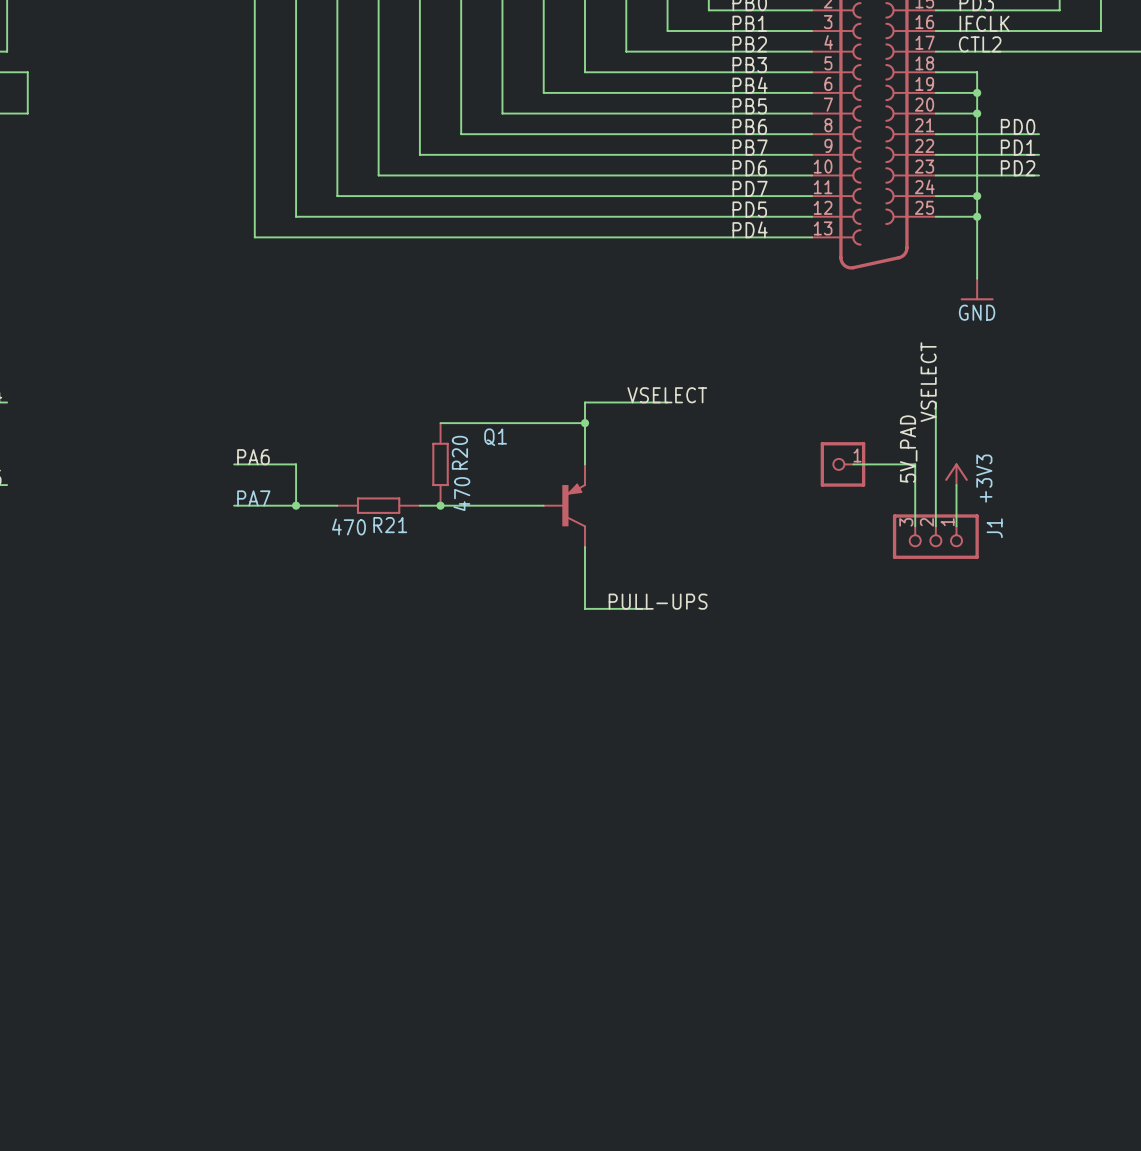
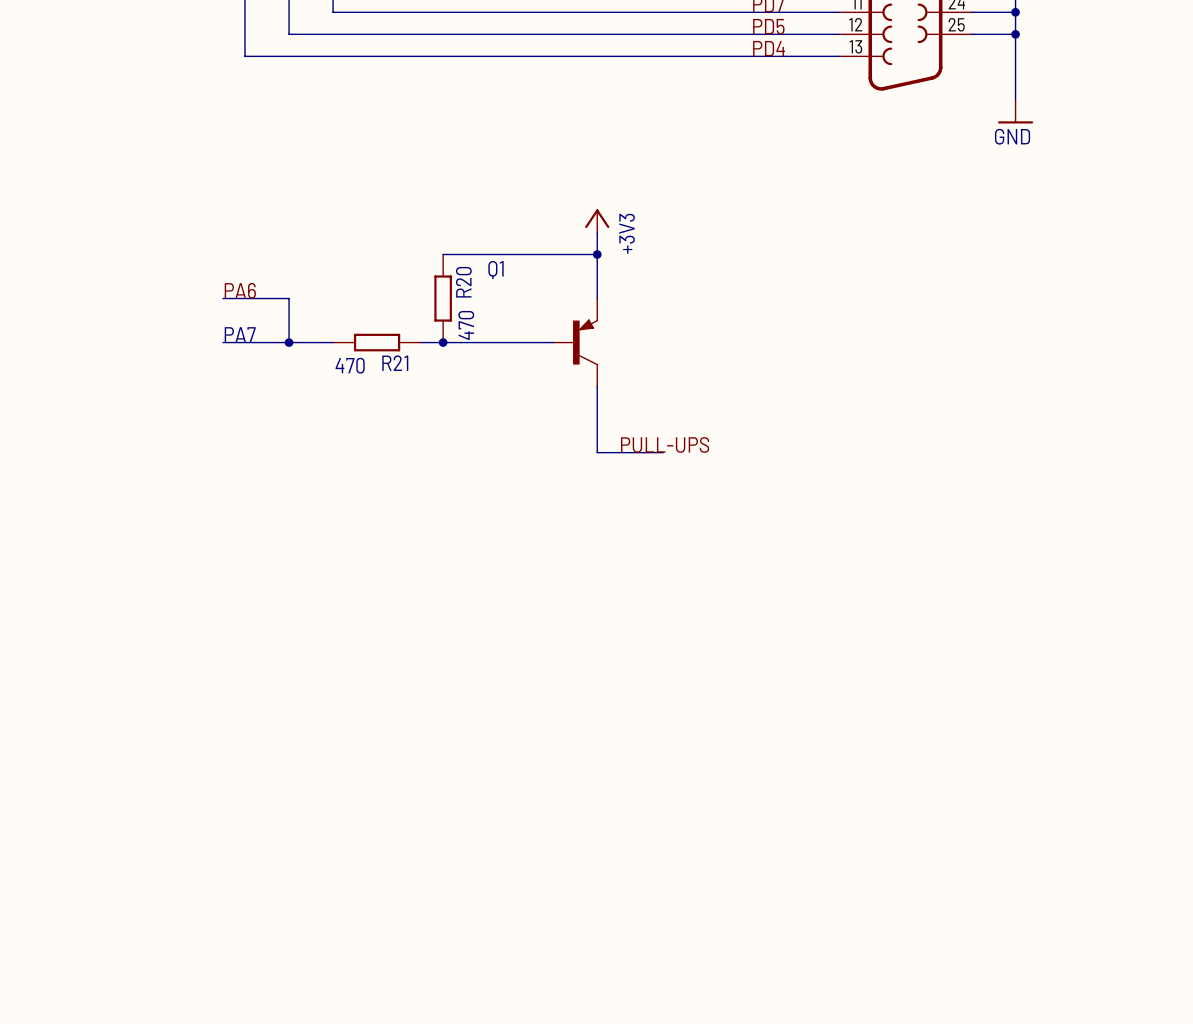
label: VSELECT (928, 382) -> none
power symbol: none -> +3V3 (597, 220)
label: VSELECT (667, 395) -> none
wire: (585, 402) (667, 402) -> none
wire: (935, 402) (935, 526) -> none
label: 5V_PAD (908, 448) -> none
part: (842, 464) -> none
wire: (853, 464) (915, 464) (915, 526) -> none
power symbol: +3V3 (956, 474) -> none
wire: (956, 485) (956, 526) -> none
J1: (935, 536) -> none

